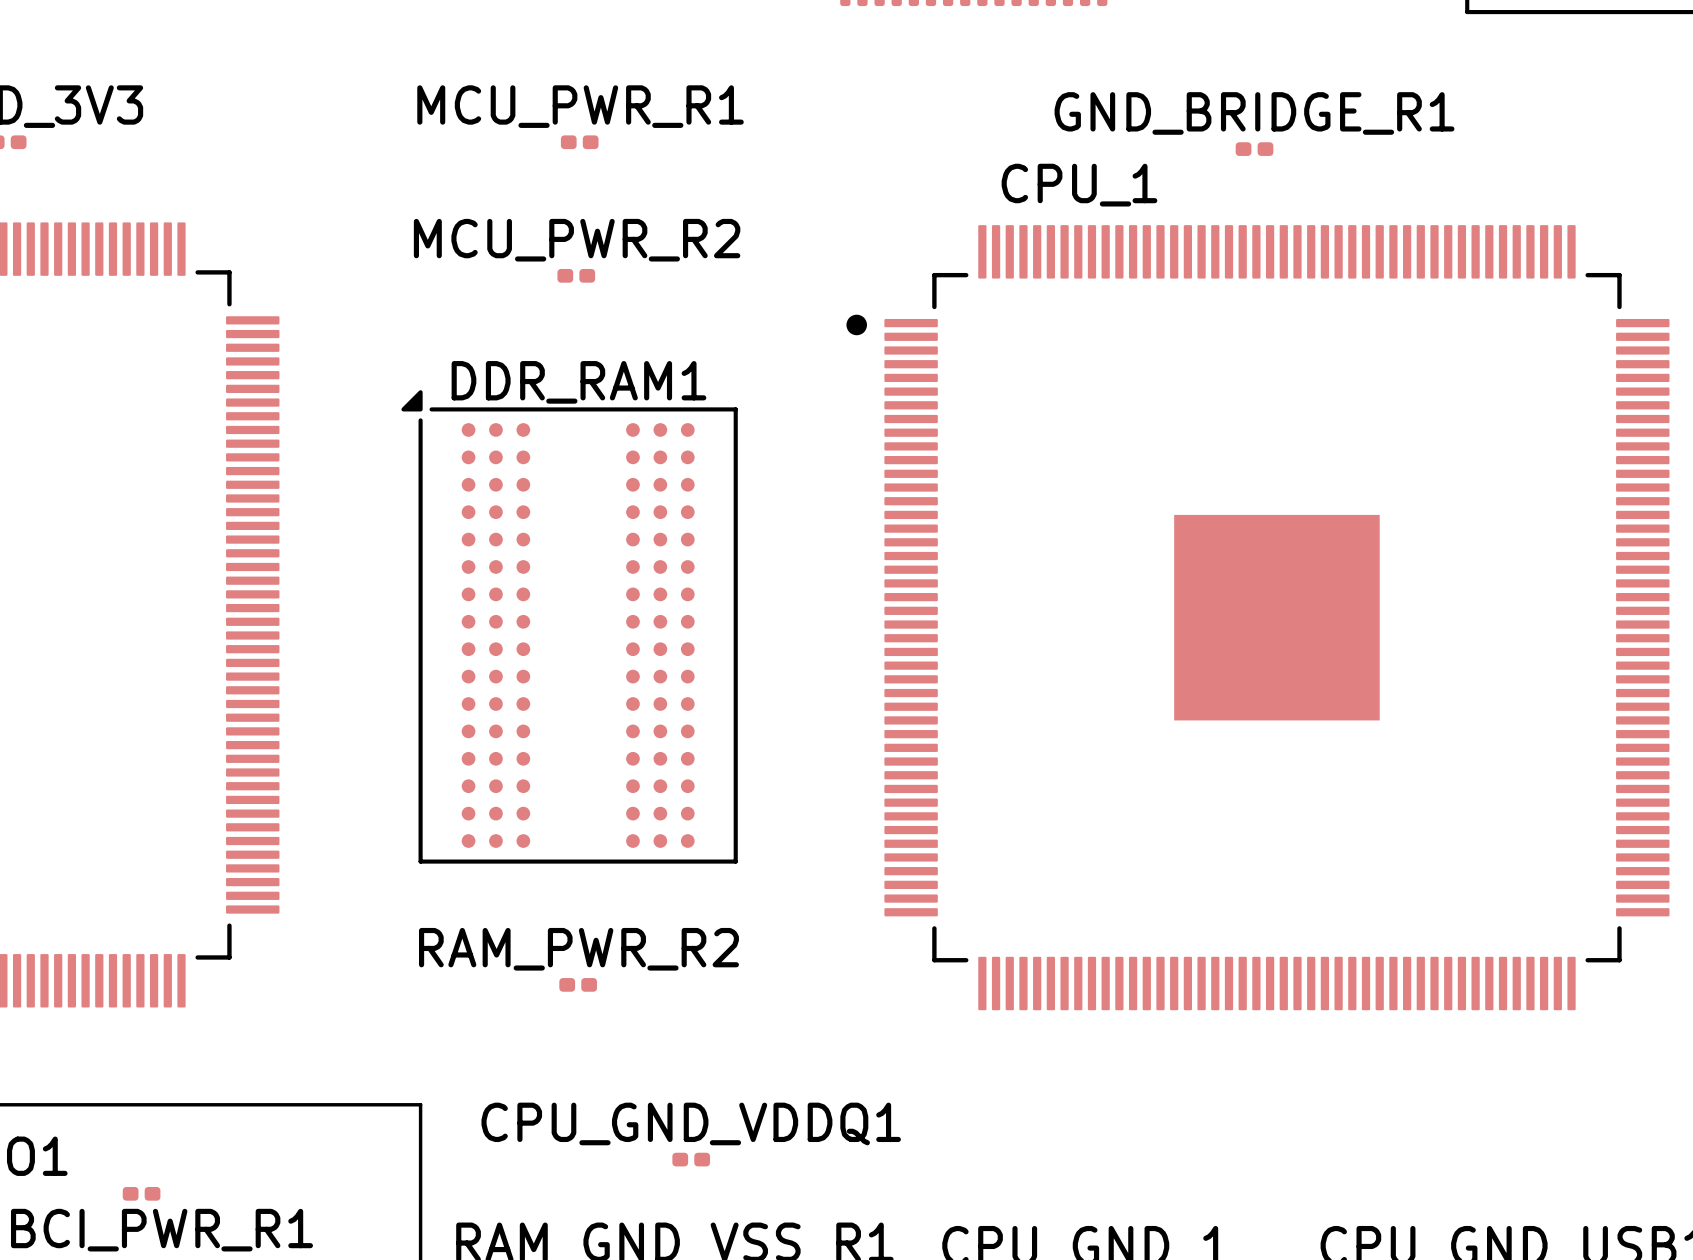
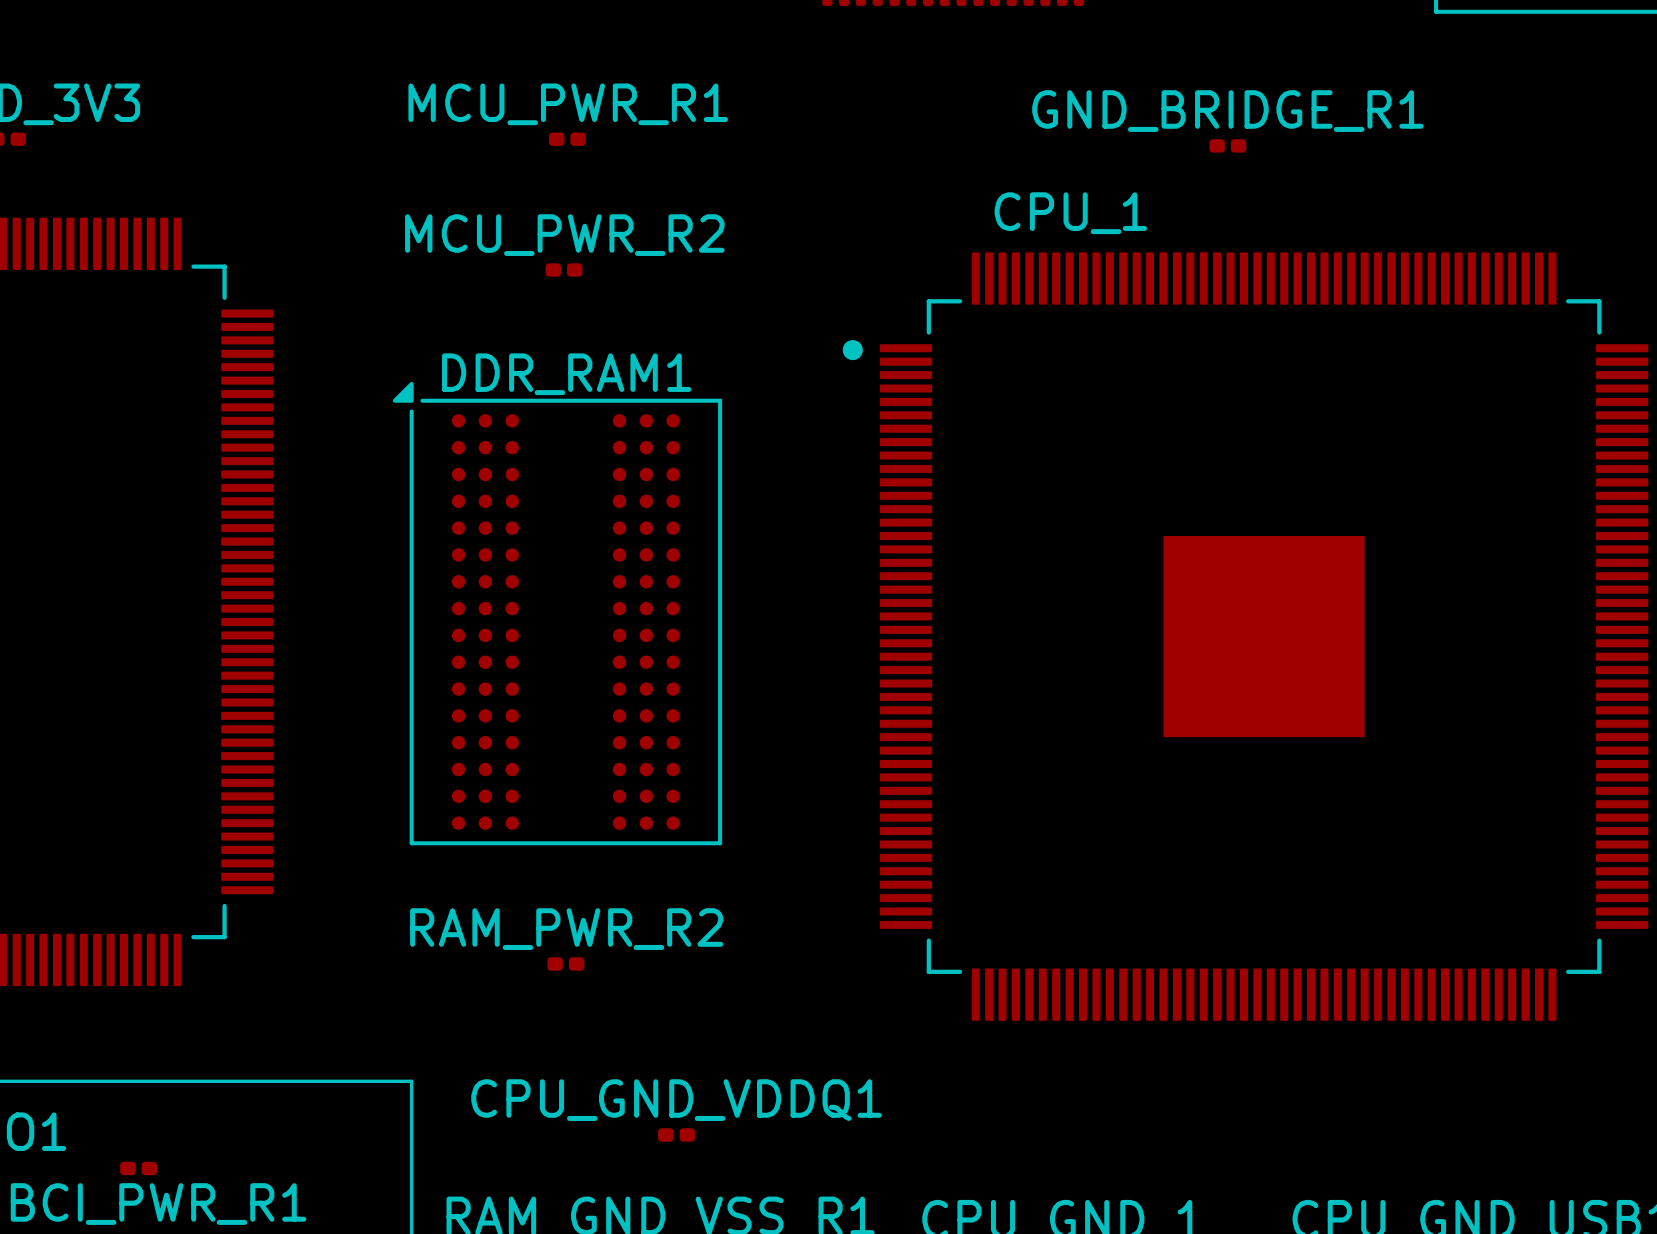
CPU_1 position: (1257, 617) -> (1245, 636)

